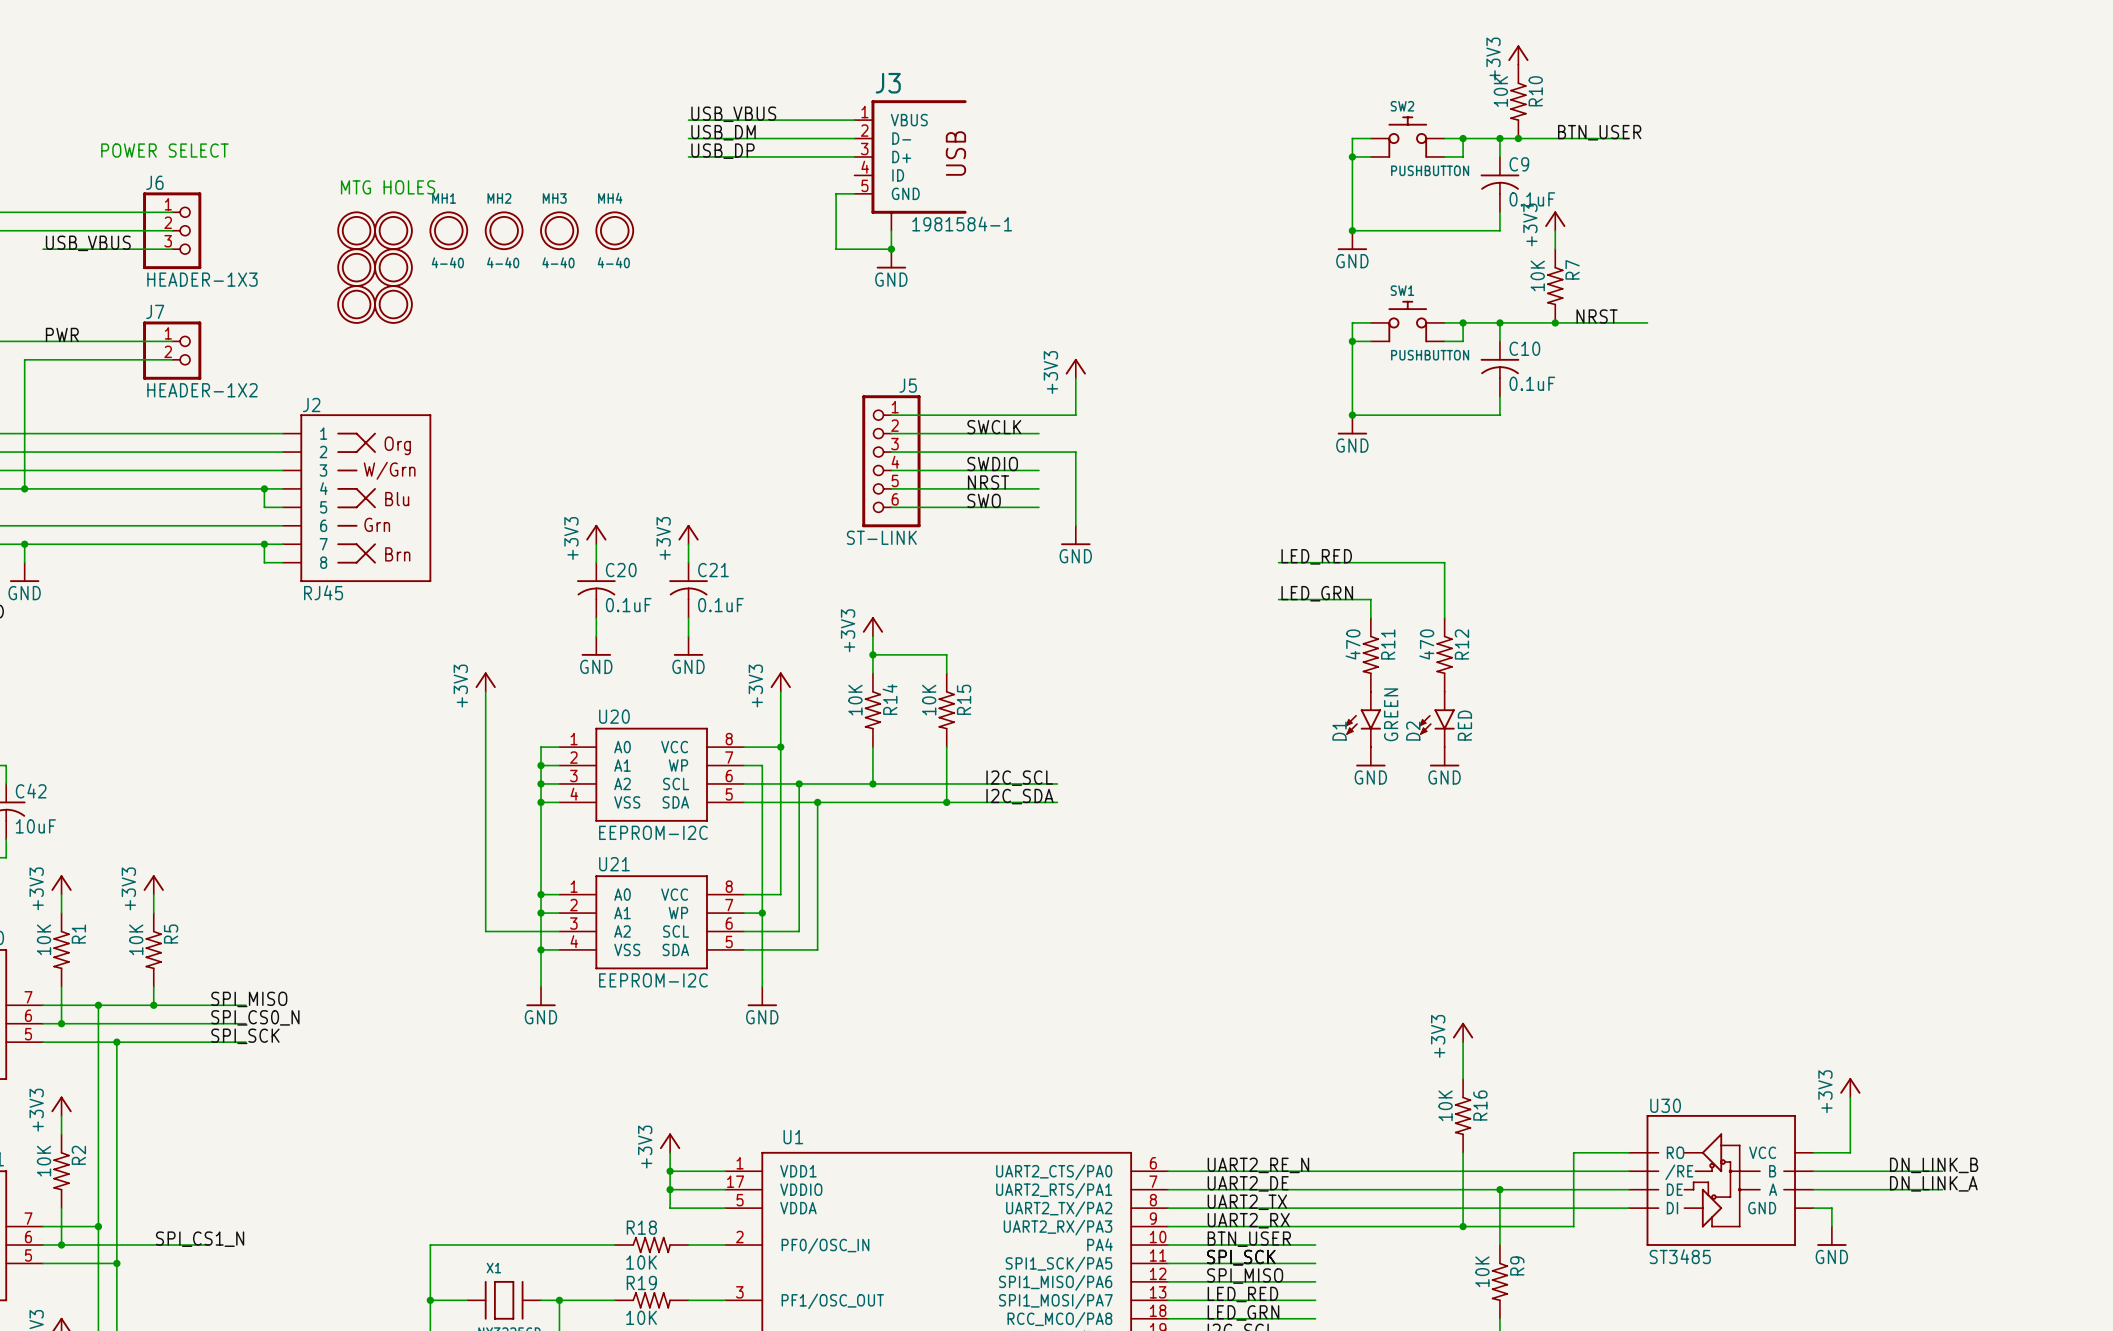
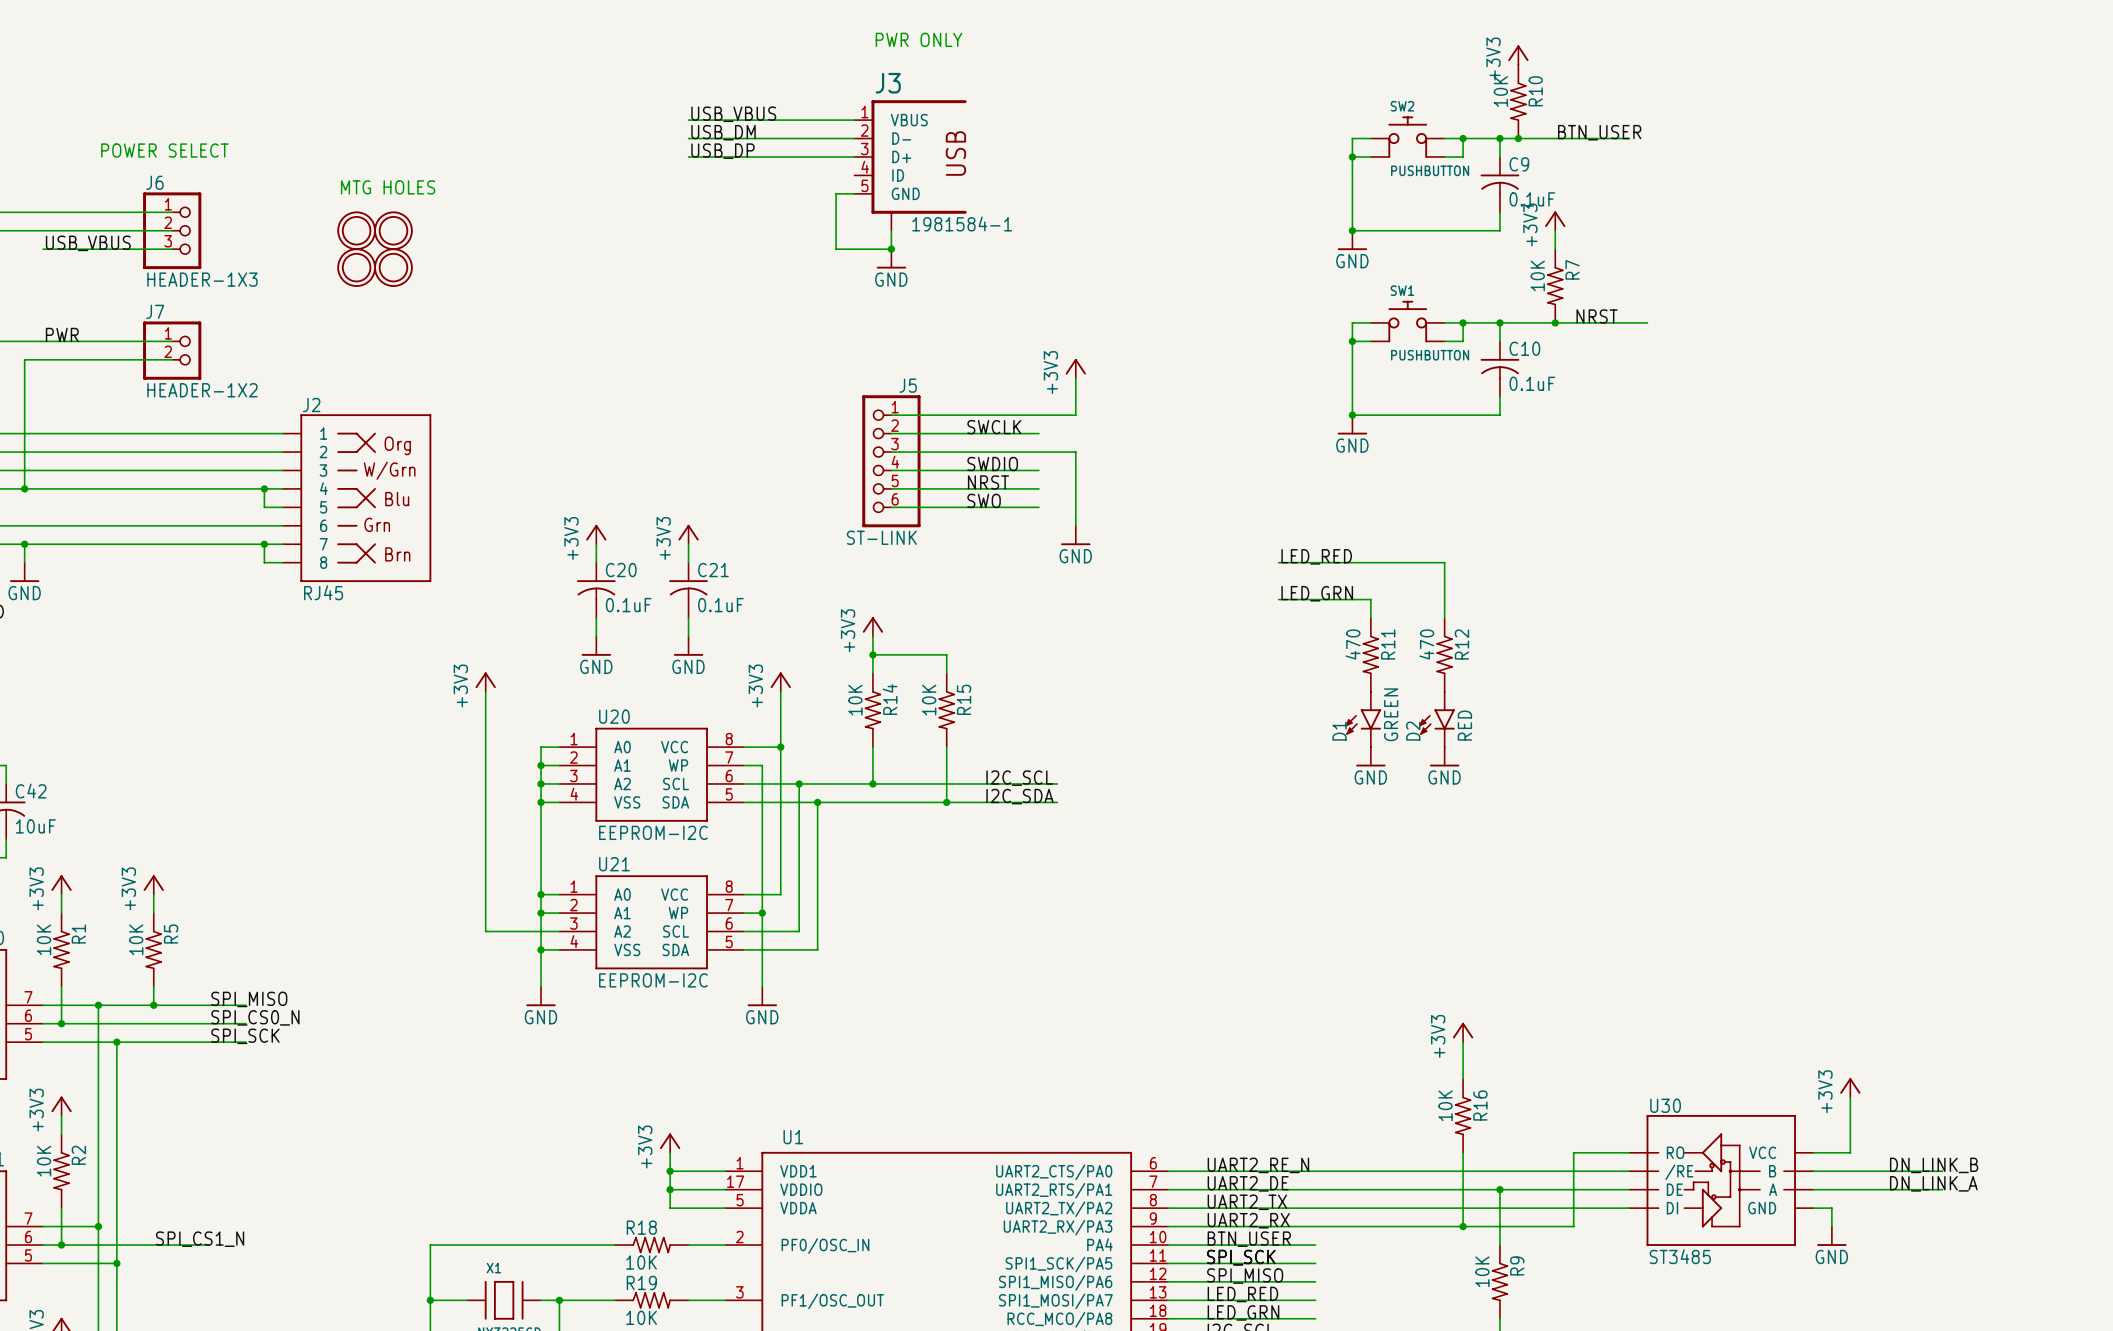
text: none -> PWR ONLY (919, 39)
MH1: 4-40 (448, 230) -> none
MH2: 4-40 (504, 230) -> none
MH3: 4-40 (559, 230) -> none
MH4: 4-40 (614, 230) -> none
part: (356, 304) -> none
part: (393, 304) -> none

